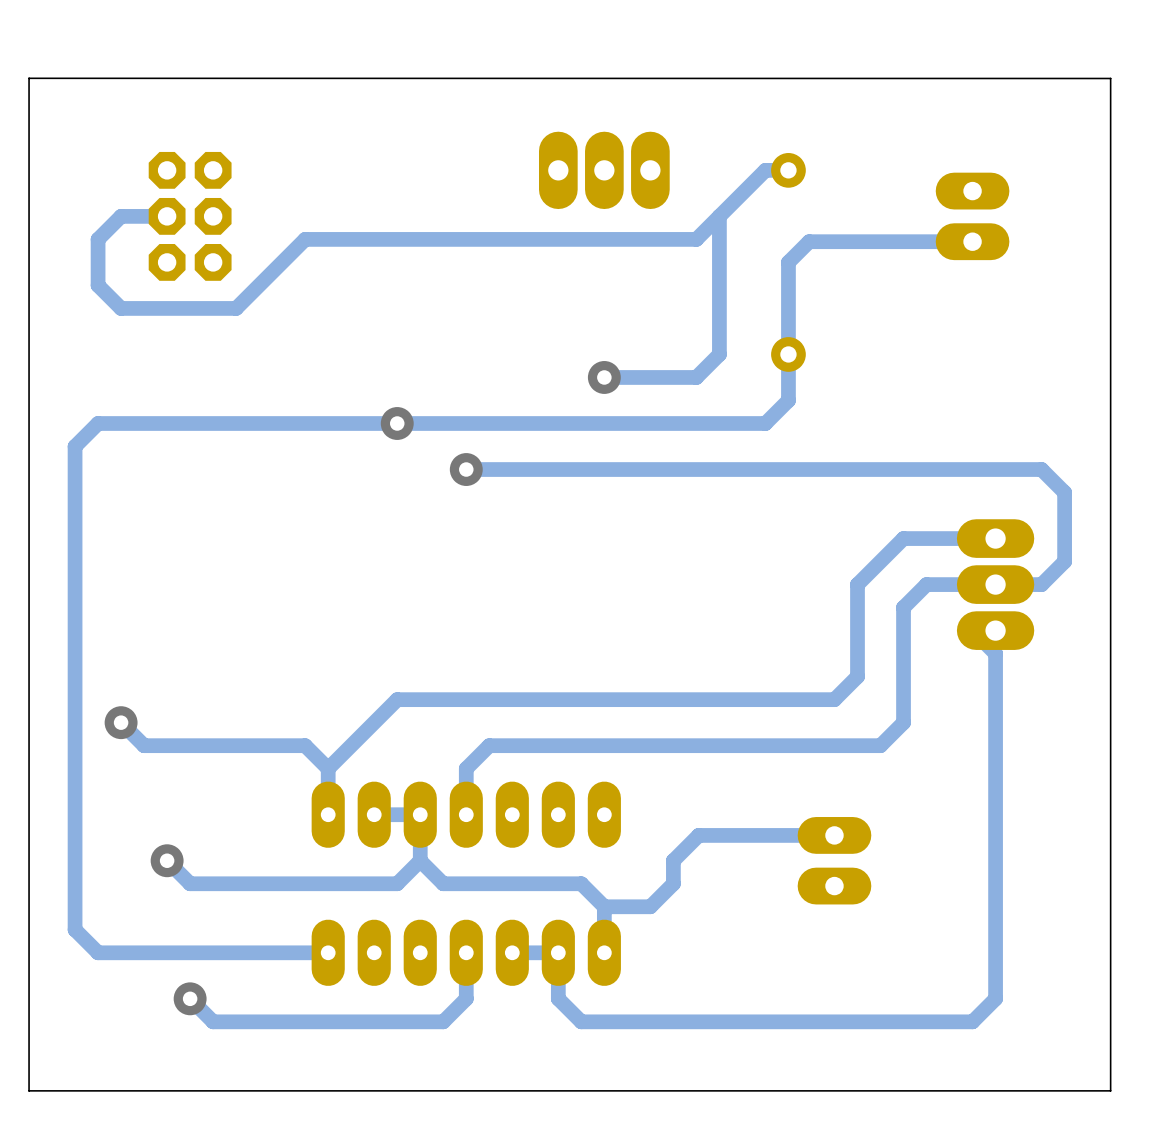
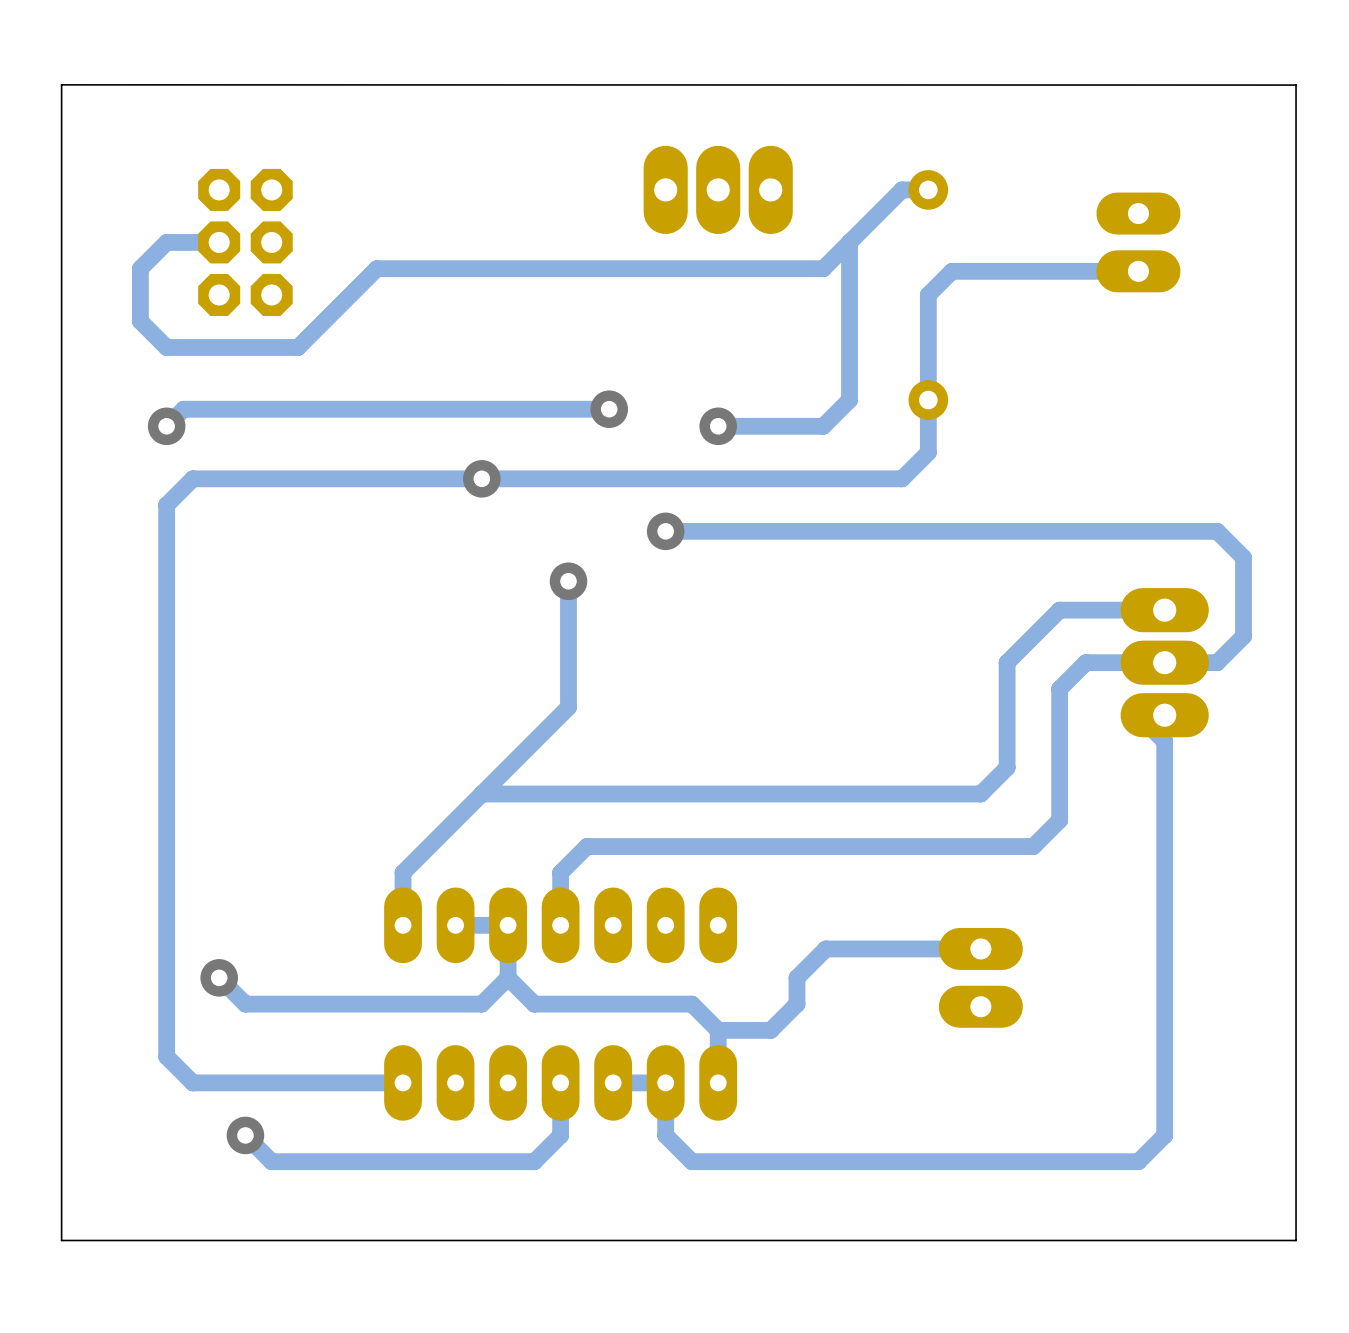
track: none -> (609, 409) (183, 409) (166, 426)
via: none -> (609, 409)
via: none -> (166, 426)
track: (144, 423) (98, 423) (75, 446) (75, 929) (98, 952) (144, 952) -> (192, 478) (166, 505) (166, 1056) (192, 1082)
via position: (466, 469) -> (568, 581)
track: (558, 469) (466, 469) -> none
via: none -> (665, 531)
track: none -> (568, 581) (568, 707) (481, 794)
track: (121, 722) (144, 745) (305, 745) (328, 768) -> none
via: (121, 722) -> none

